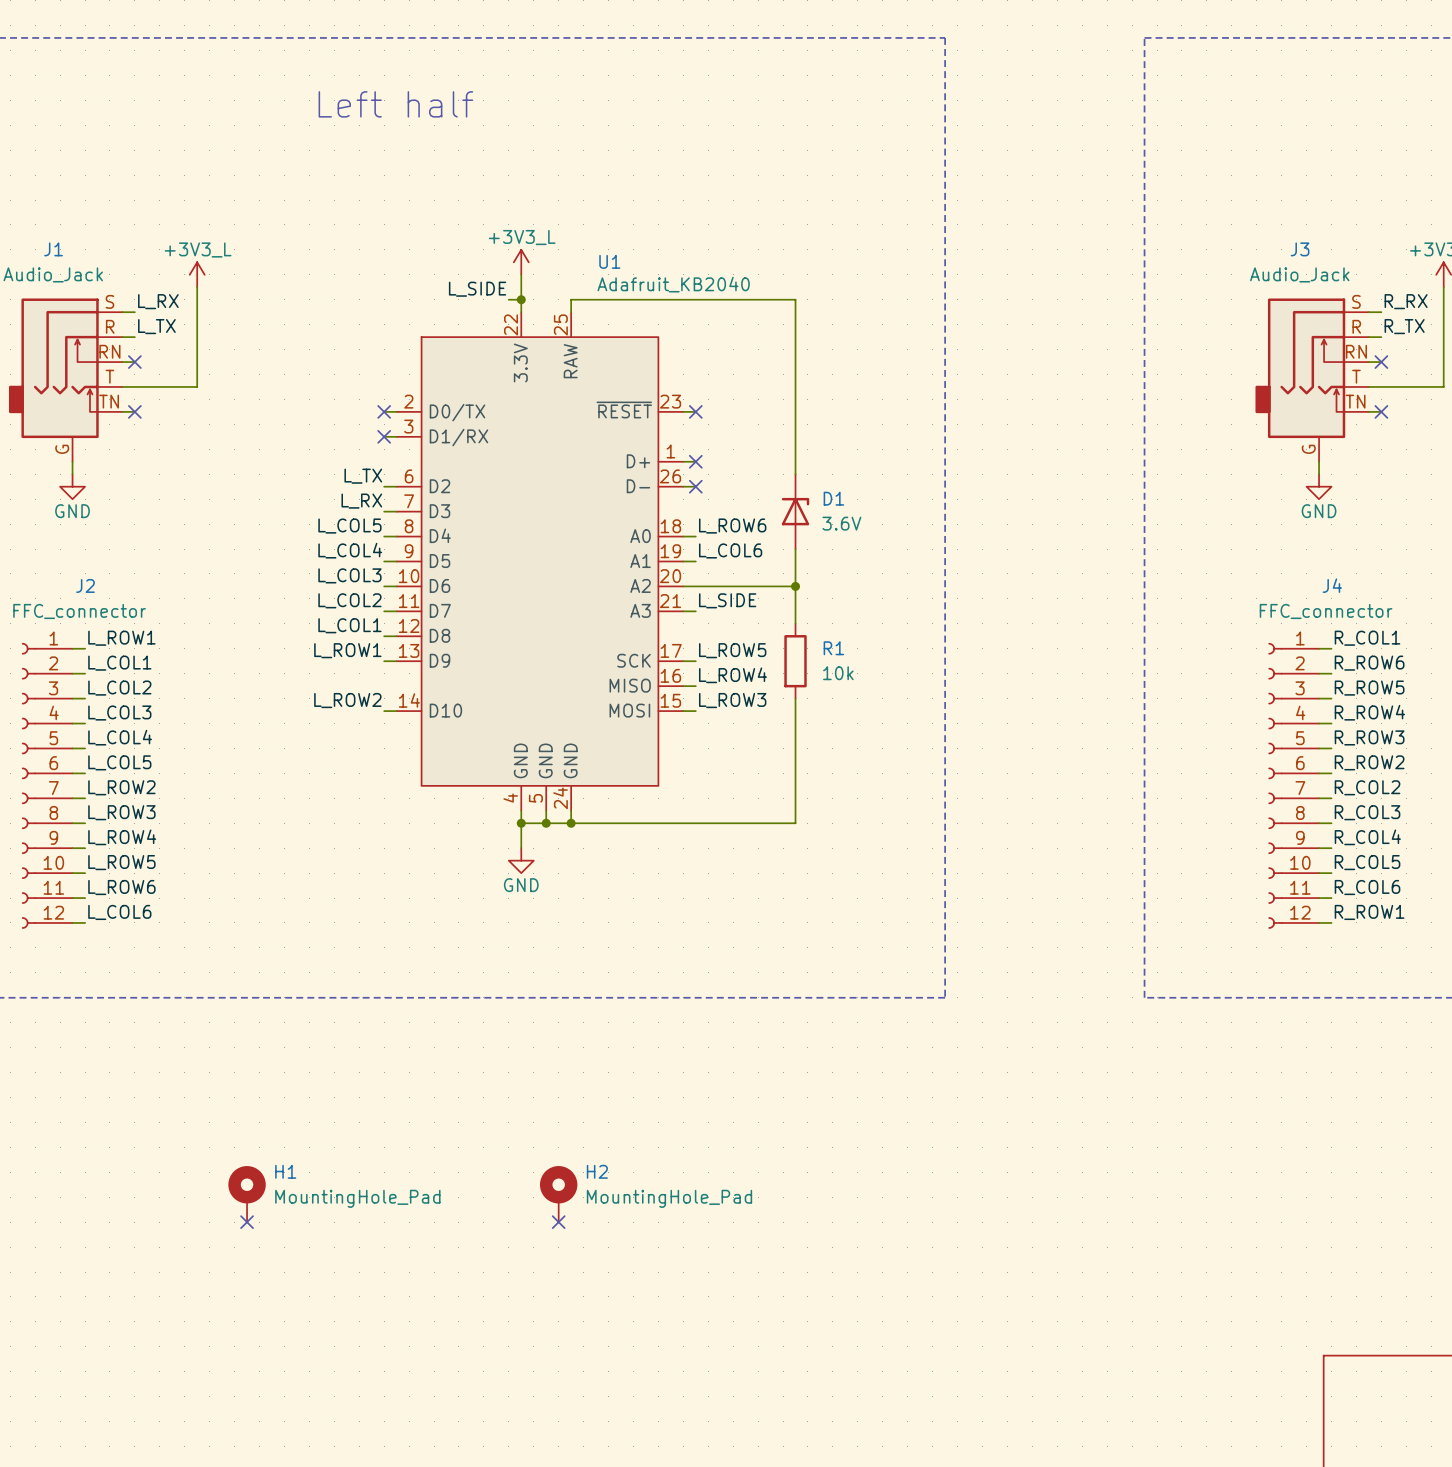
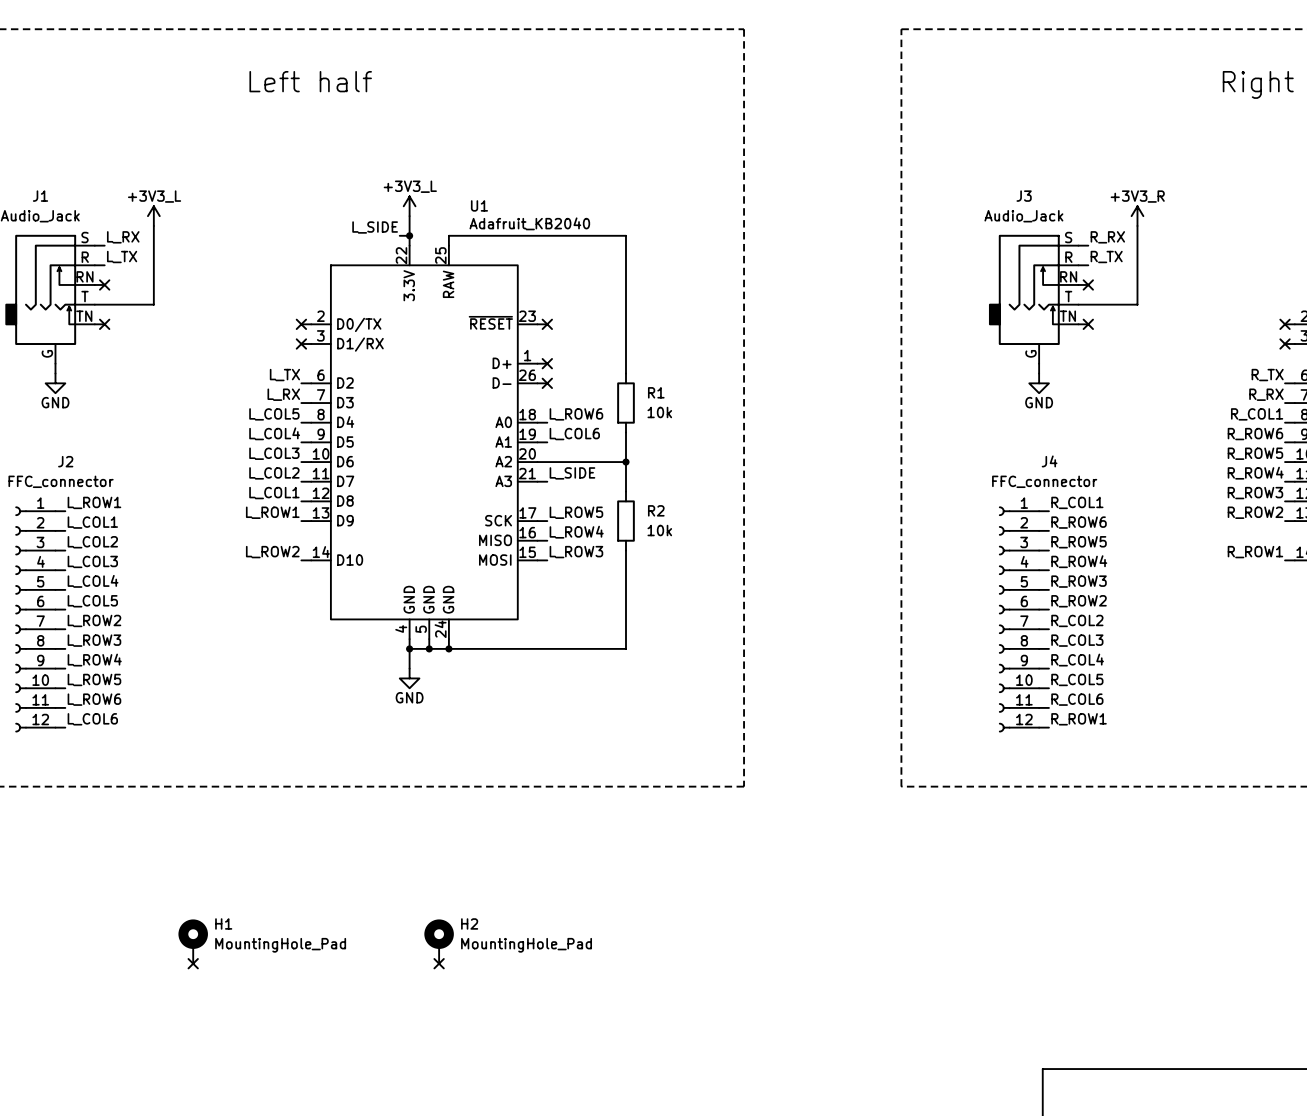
D1: 3.6V (795, 511) -> none
R1: none -> 10k (626, 403)
R1 name: R1 (833, 648) -> R2 (656, 510)

